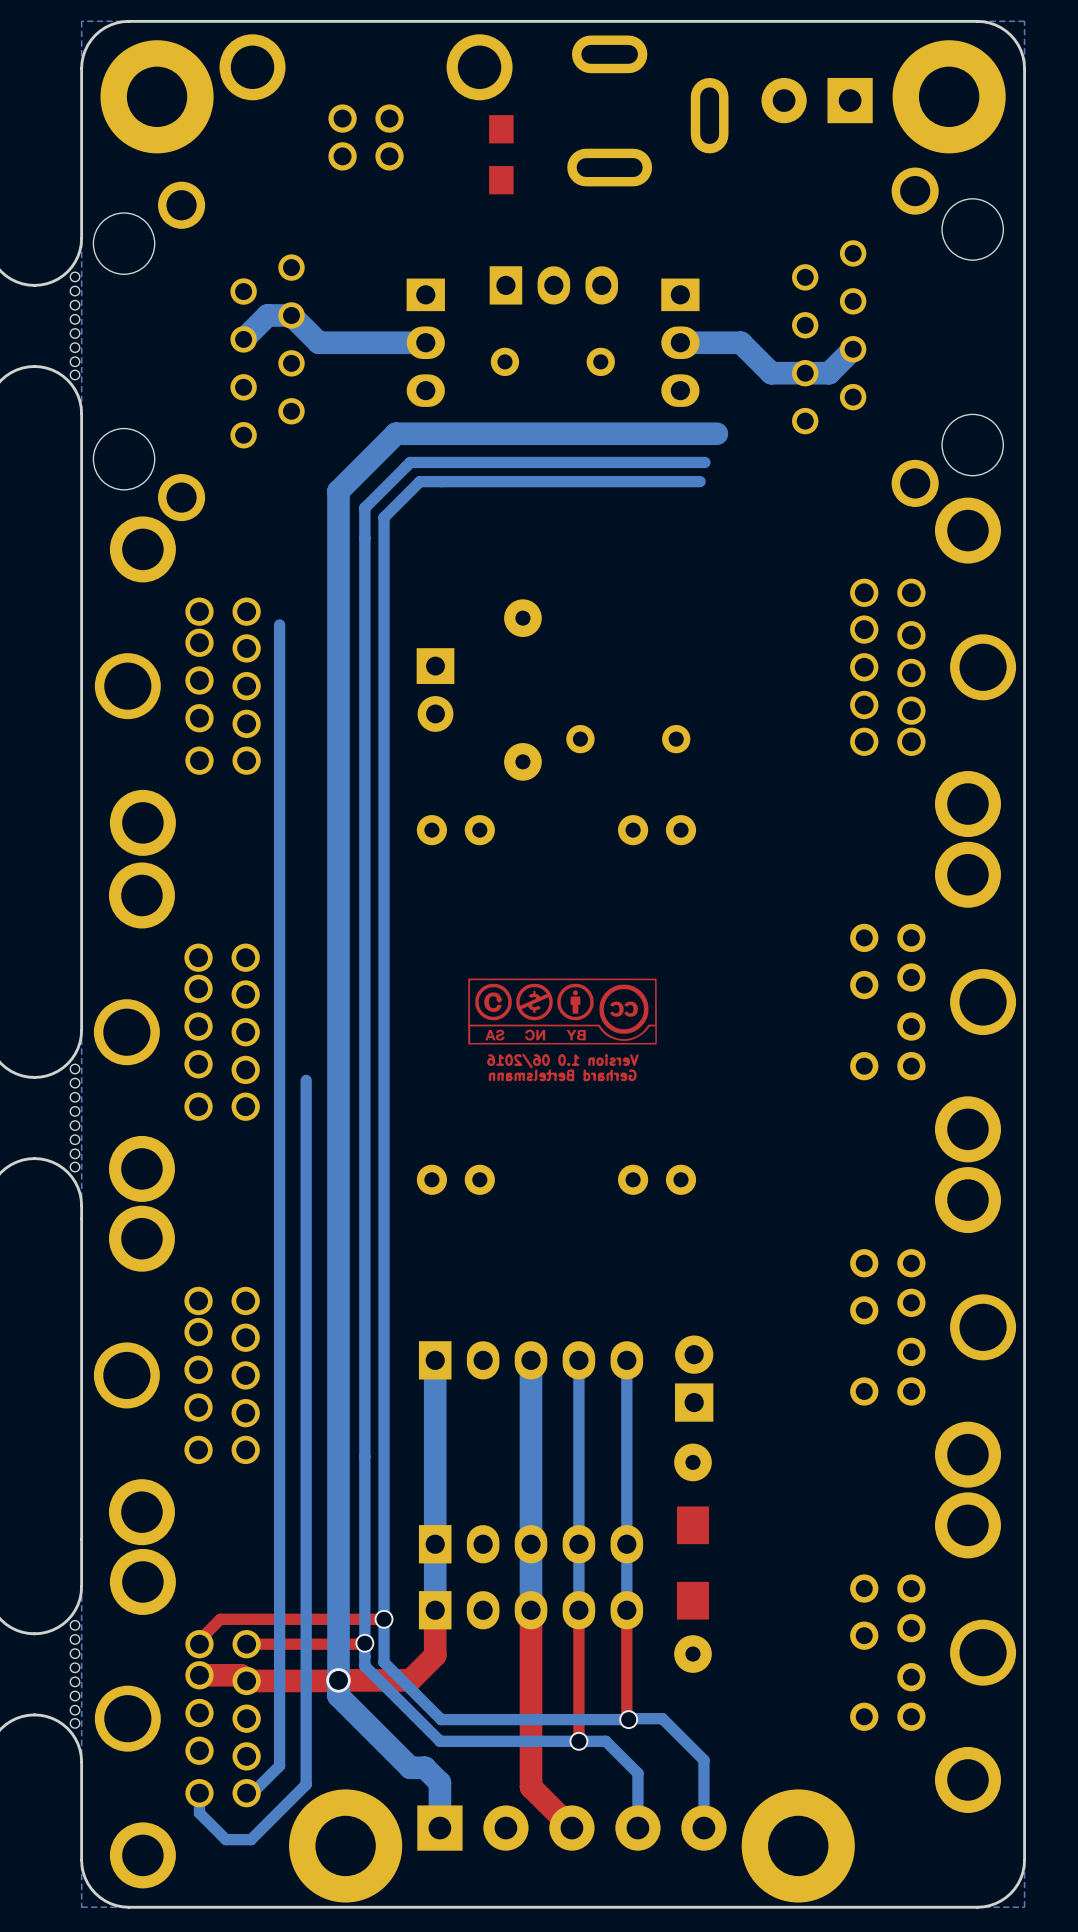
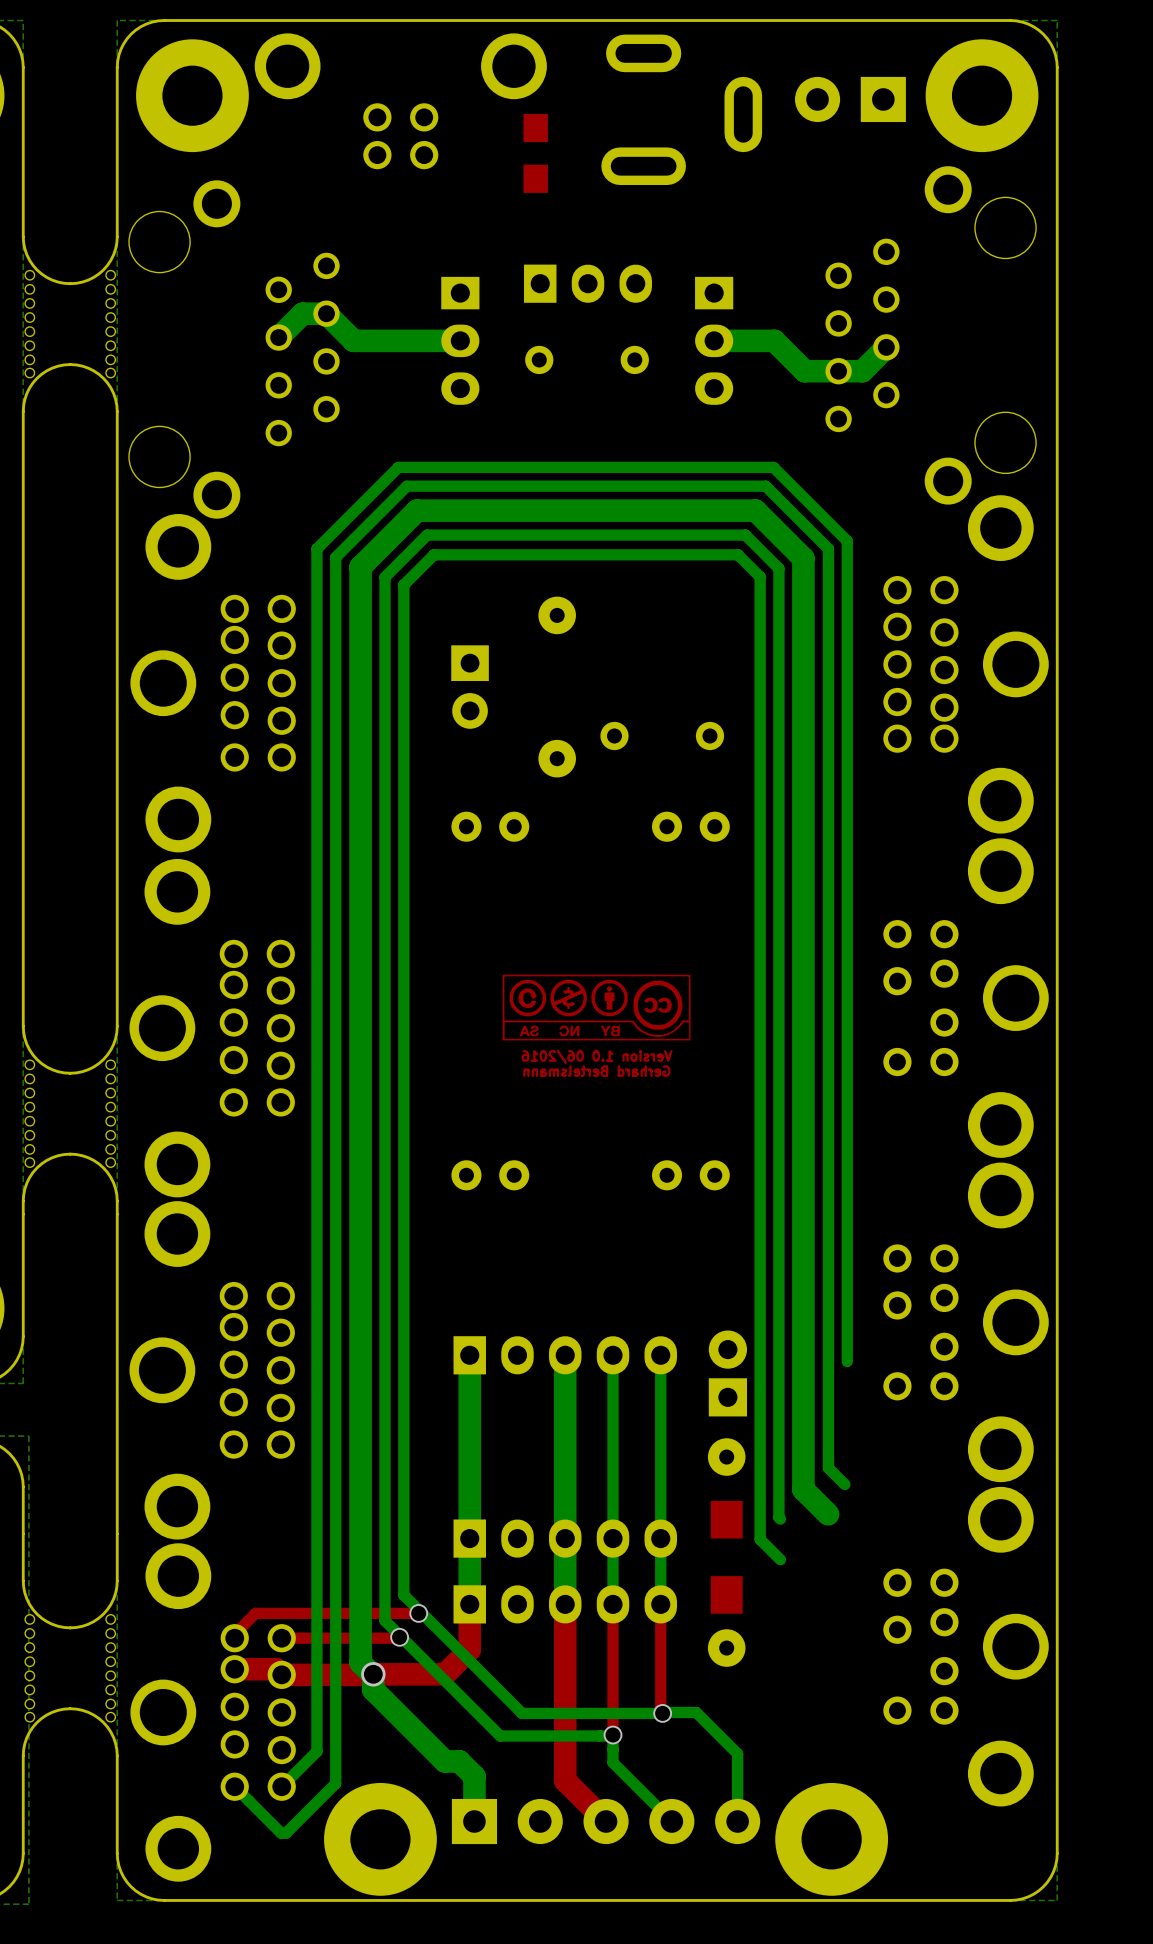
bottom track: (716, 433) (395, 433) (338, 491) (338, 1681) -> (828, 1514) (803, 1489) (803, 558) (755, 510) (417, 510) (360, 567) (360, 1662) (373, 1675)
bottom track: (704, 462) (410, 462) (364, 507) (364, 1666) (440, 1741) (605, 1741) (637, 1773) (637, 1828) -> (780, 1519) (778, 568) (745, 535) (427, 535) (385, 577) (385, 1620) (500, 1735) (613, 1735) (613, 1762) (671, 1821)
bottom track: (700, 481) (419, 481) (384, 517) (384, 1662) (441, 1719) (487, 1719) -> (780, 1559) (760, 1539) (760, 576) (738, 554) (433, 554) (403, 585) (403, 1595) (522, 1713)
bottom track: (279, 624) (279, 1765) (252, 1793) (246, 1793) -> (847, 1361) (847, 541) (773, 467) (398, 467) (316, 548) (316, 1751) (281, 1786)
bottom track: (306, 1080) (306, 1784) (300, 1789) -> (844, 1484) (828, 1468) (828, 548) (765, 486) (406, 486) (335, 557) (335, 1783)
bottom track: (199, 1793) (199, 1813) (225, 1839) (245, 1839) -> (234, 1786) (281, 1833)

